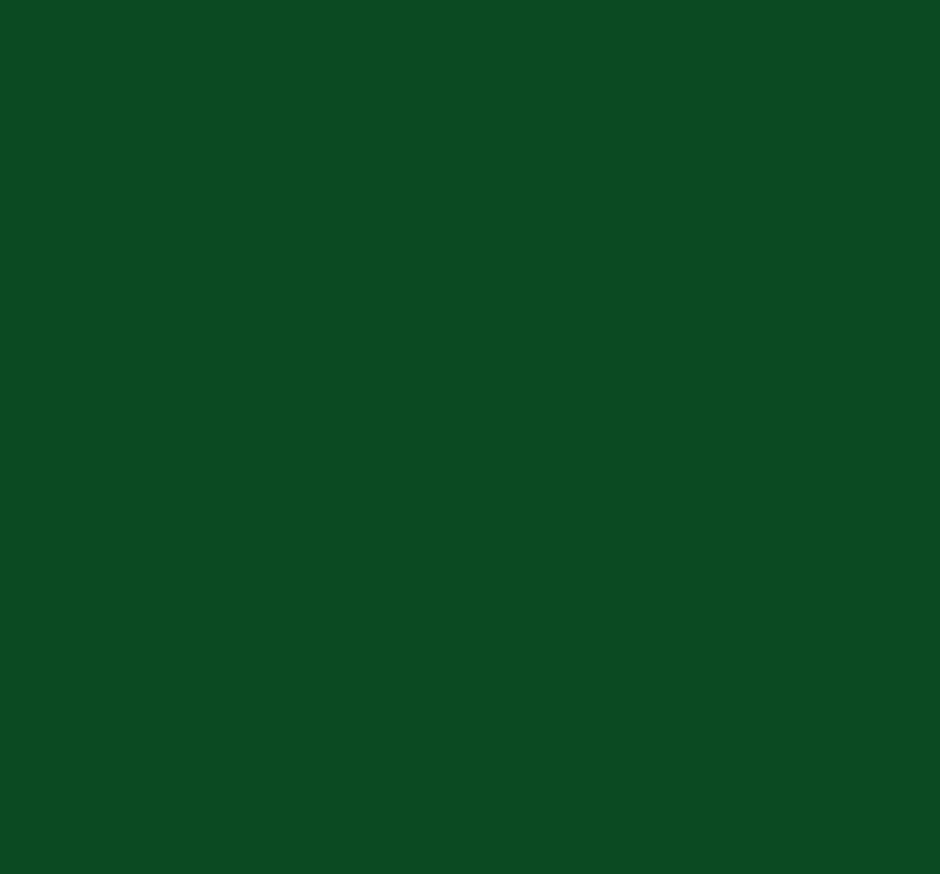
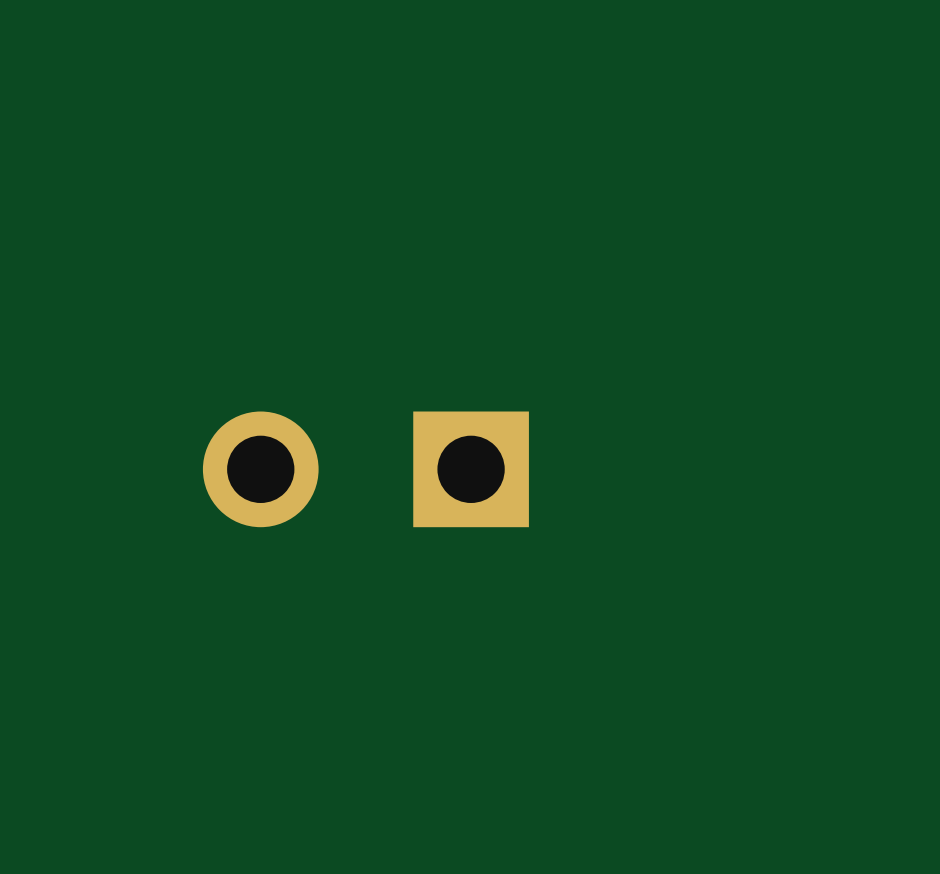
part: none -> (365, 469)

